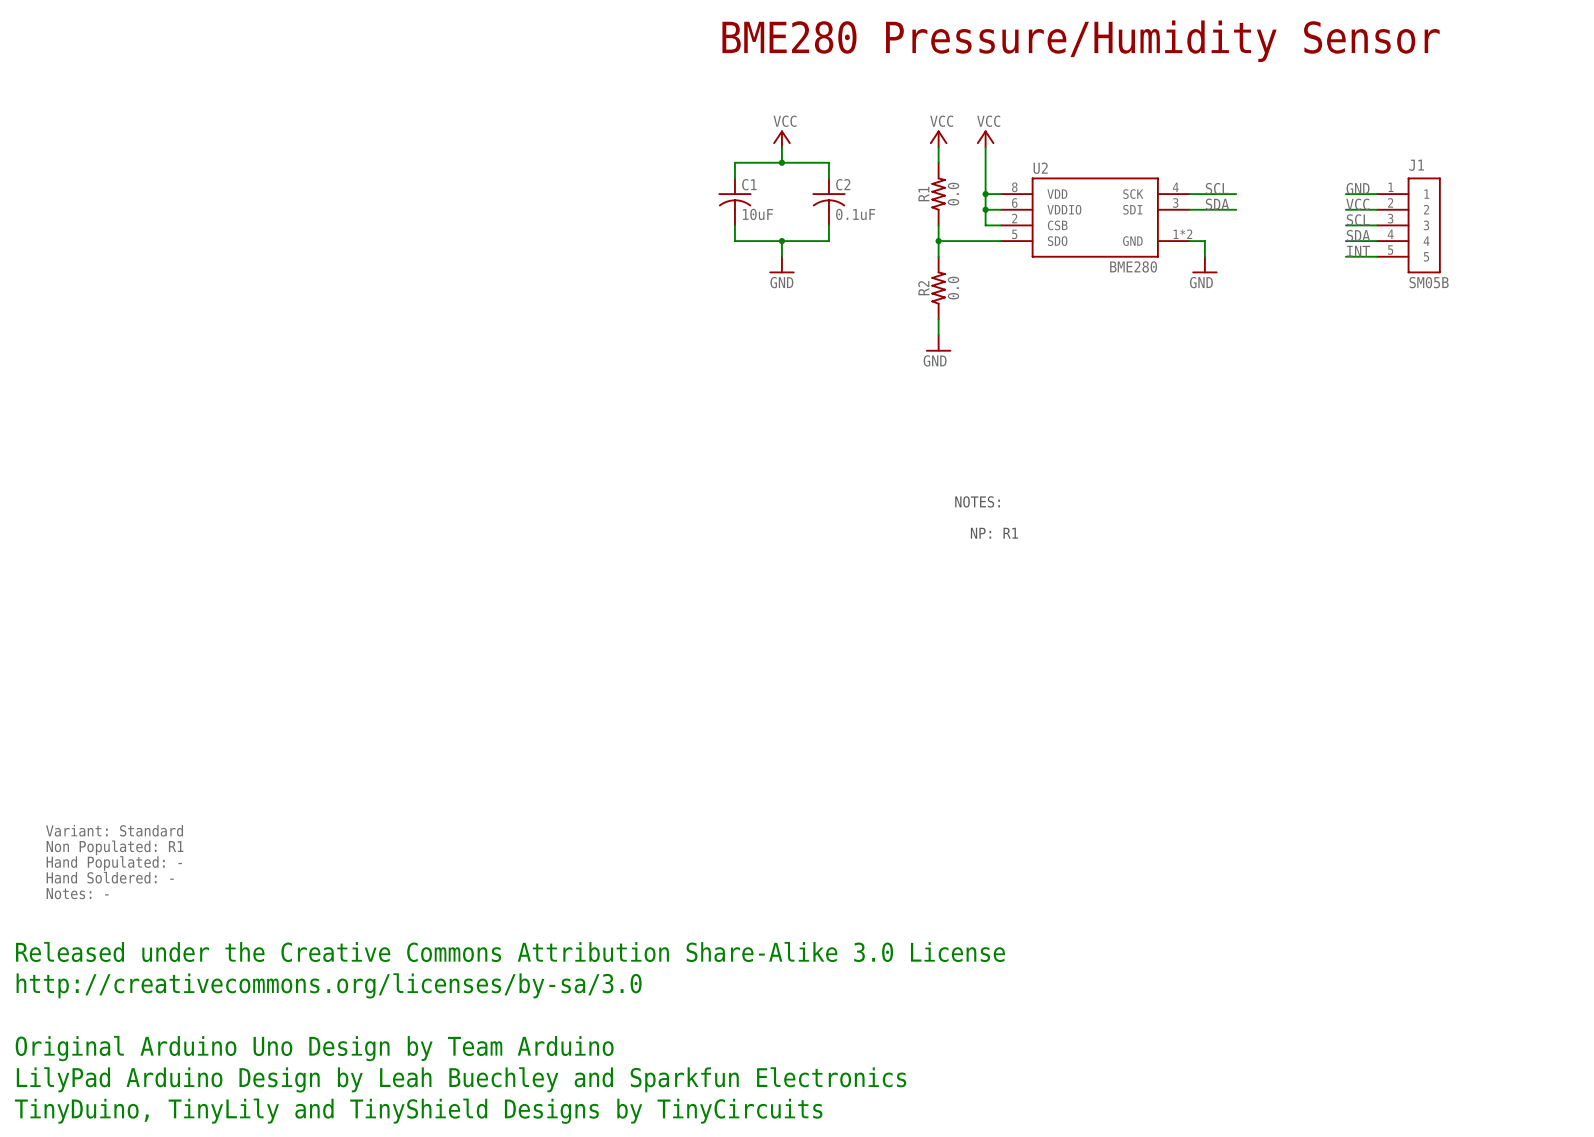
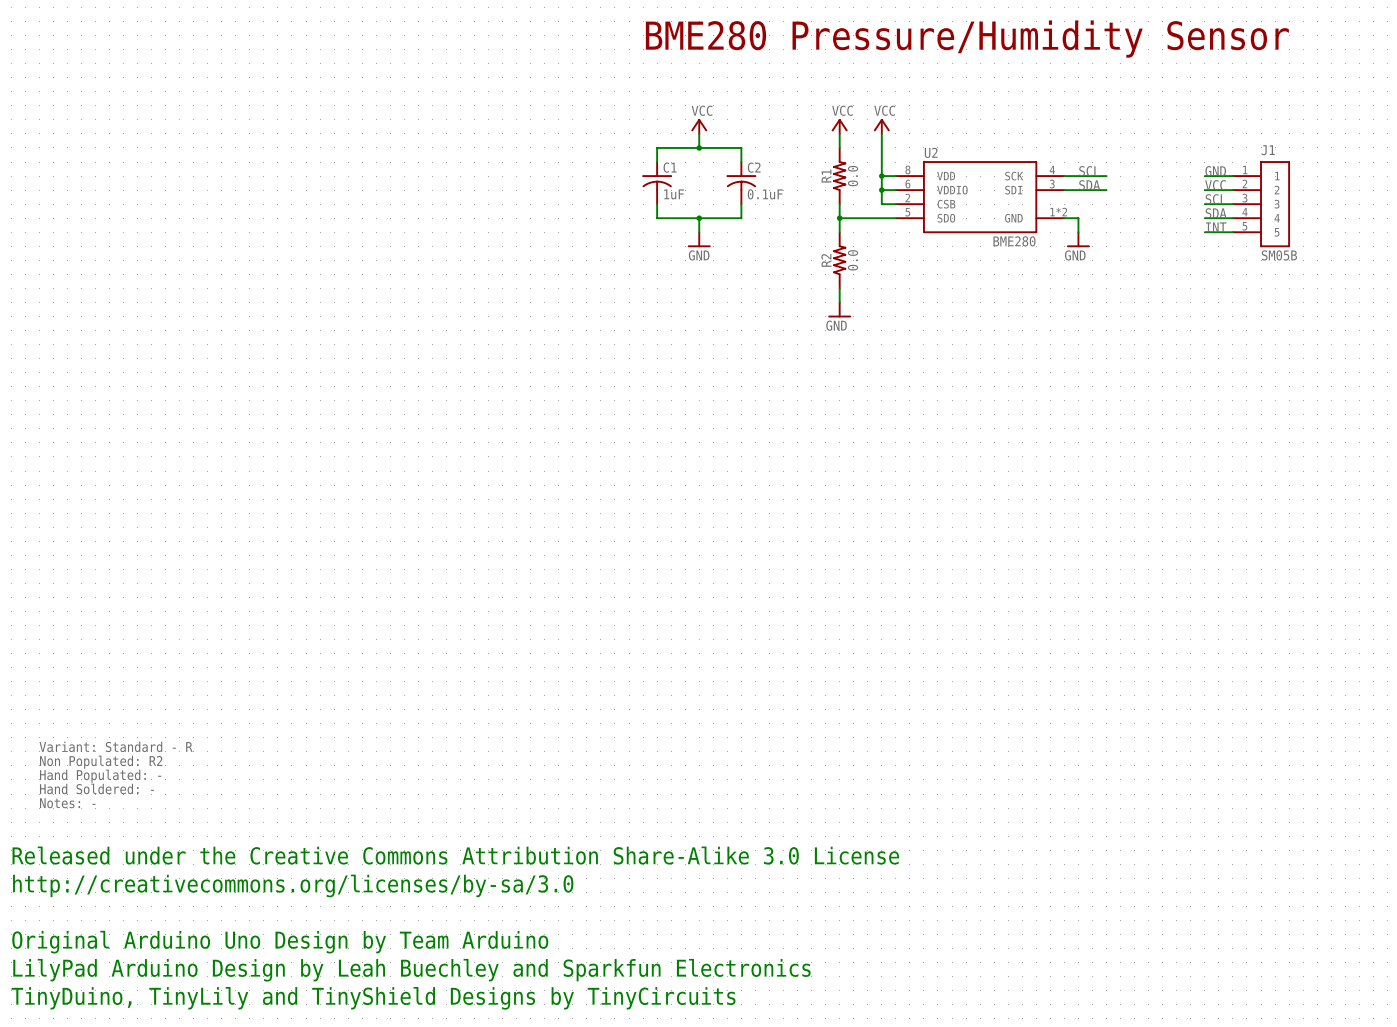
C1 value: 10uF (757, 214) -> 1uF (674, 194)
text: NOTES: (977, 501) -> none
text: NP: R1 (994, 533) -> none
text: Variant: Standard (114, 830) -> Variant: Standard - R (116, 746)
text: Non Populated: R1 (115, 847) -> Non Populated: R2 (101, 762)

